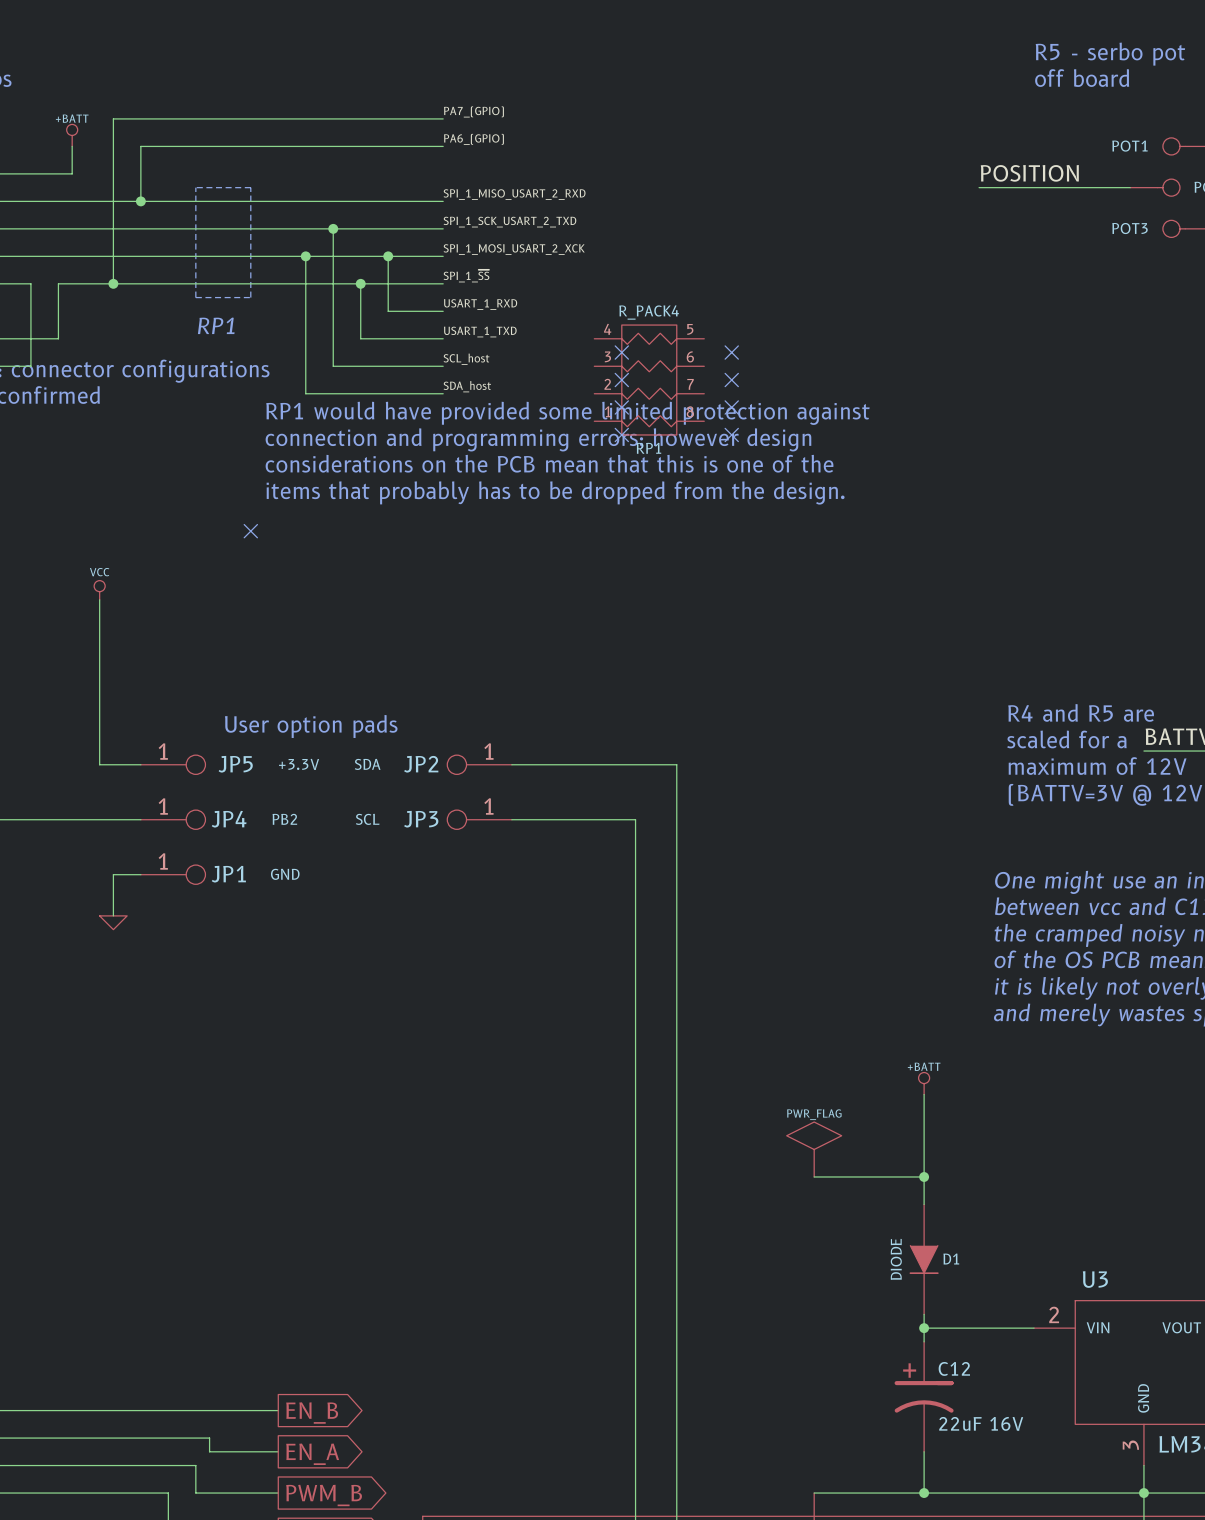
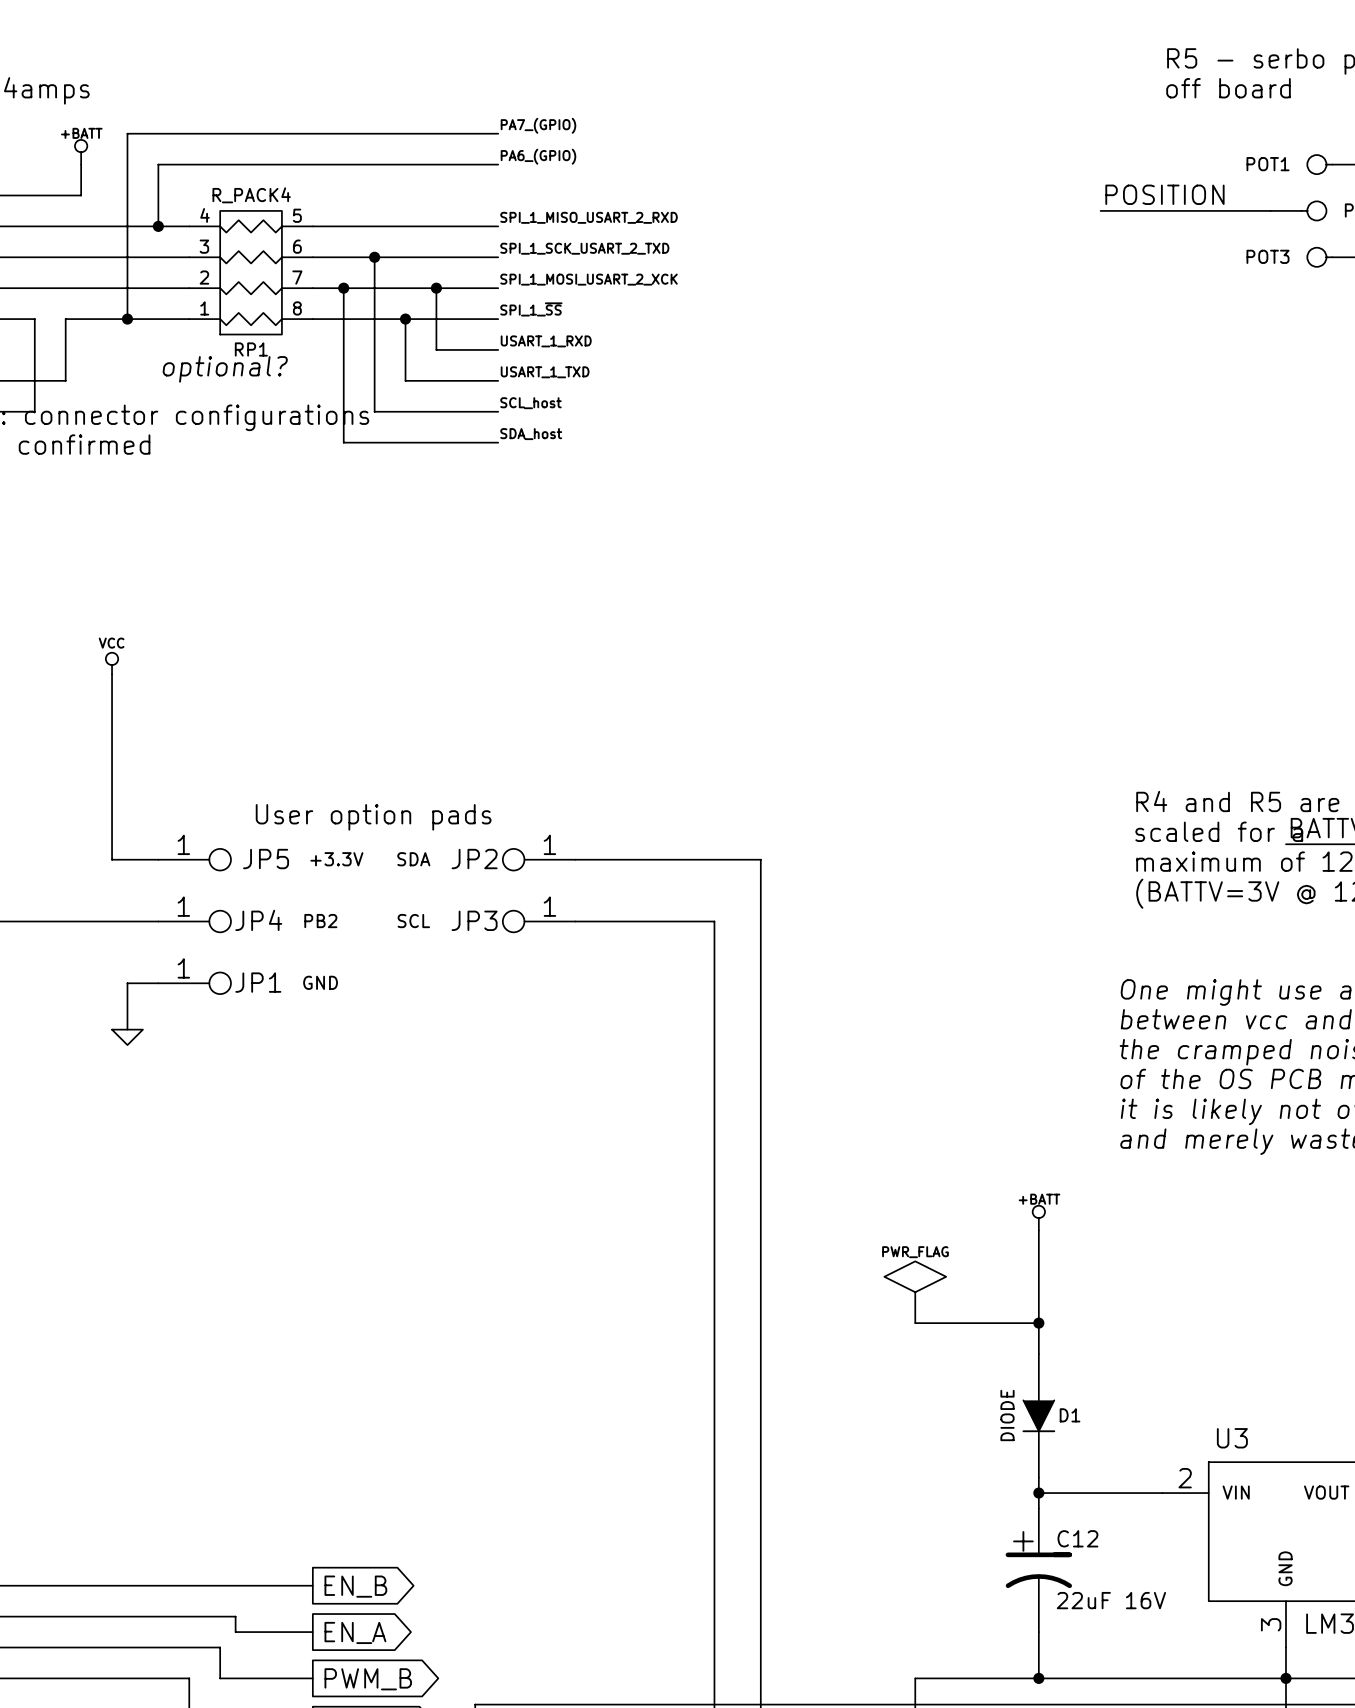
line: (195, 187) (195, 297) (250, 297) (250, 187) (195, 187) -> none
text: RP1 (216, 325) -> none
text: none -> optional? (225, 369)
no-connect mark: (621, 352) -> none
no-connect mark: (731, 352) -> none
no-connect mark: (621, 380) -> none
RP1 position: (649, 380) -> (251, 272)
no-connect mark: (731, 380) -> none
no-connect mark: (621, 407) -> none
no-connect mark: (731, 407) -> none
text: RP1 would have provided some limited protection against (567, 413) -> none
no-connect mark: (621, 434) -> none
no-connect mark: (731, 434) -> none
text: connection and programming errors; however design (538, 439) -> none
text: considerations on the PCB mean that this is one of the (549, 463) -> none
text: items that probably has to be dropped from the design. (555, 492) -> none
no-connect mark: (250, 531) -> none

